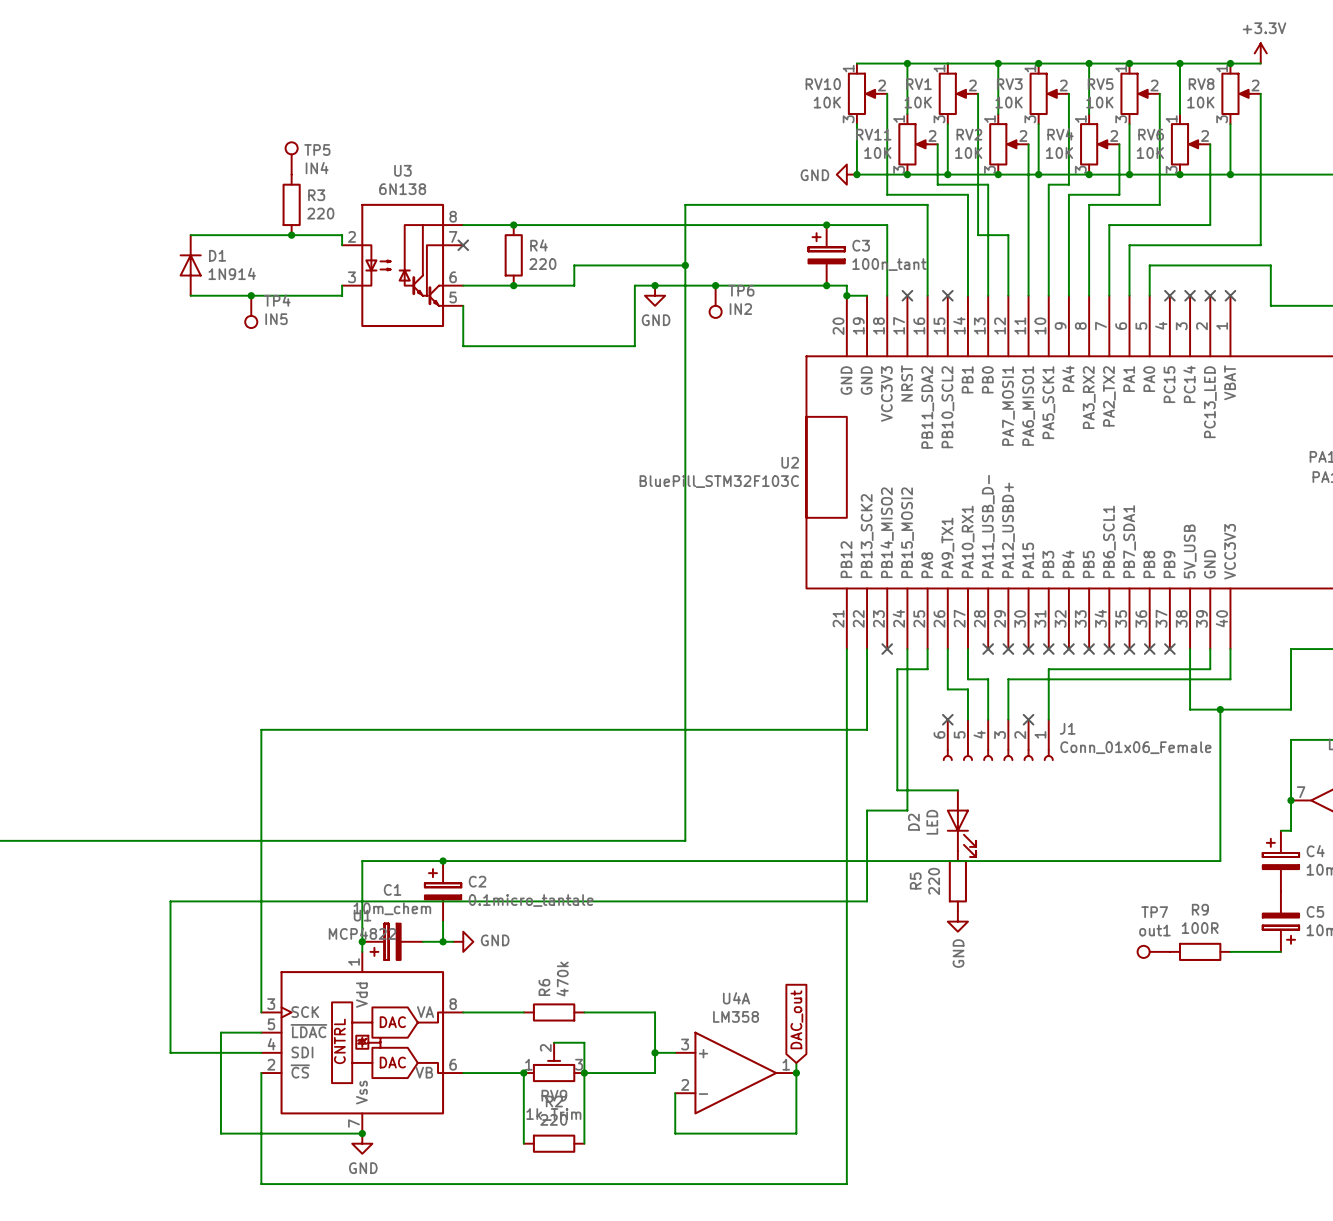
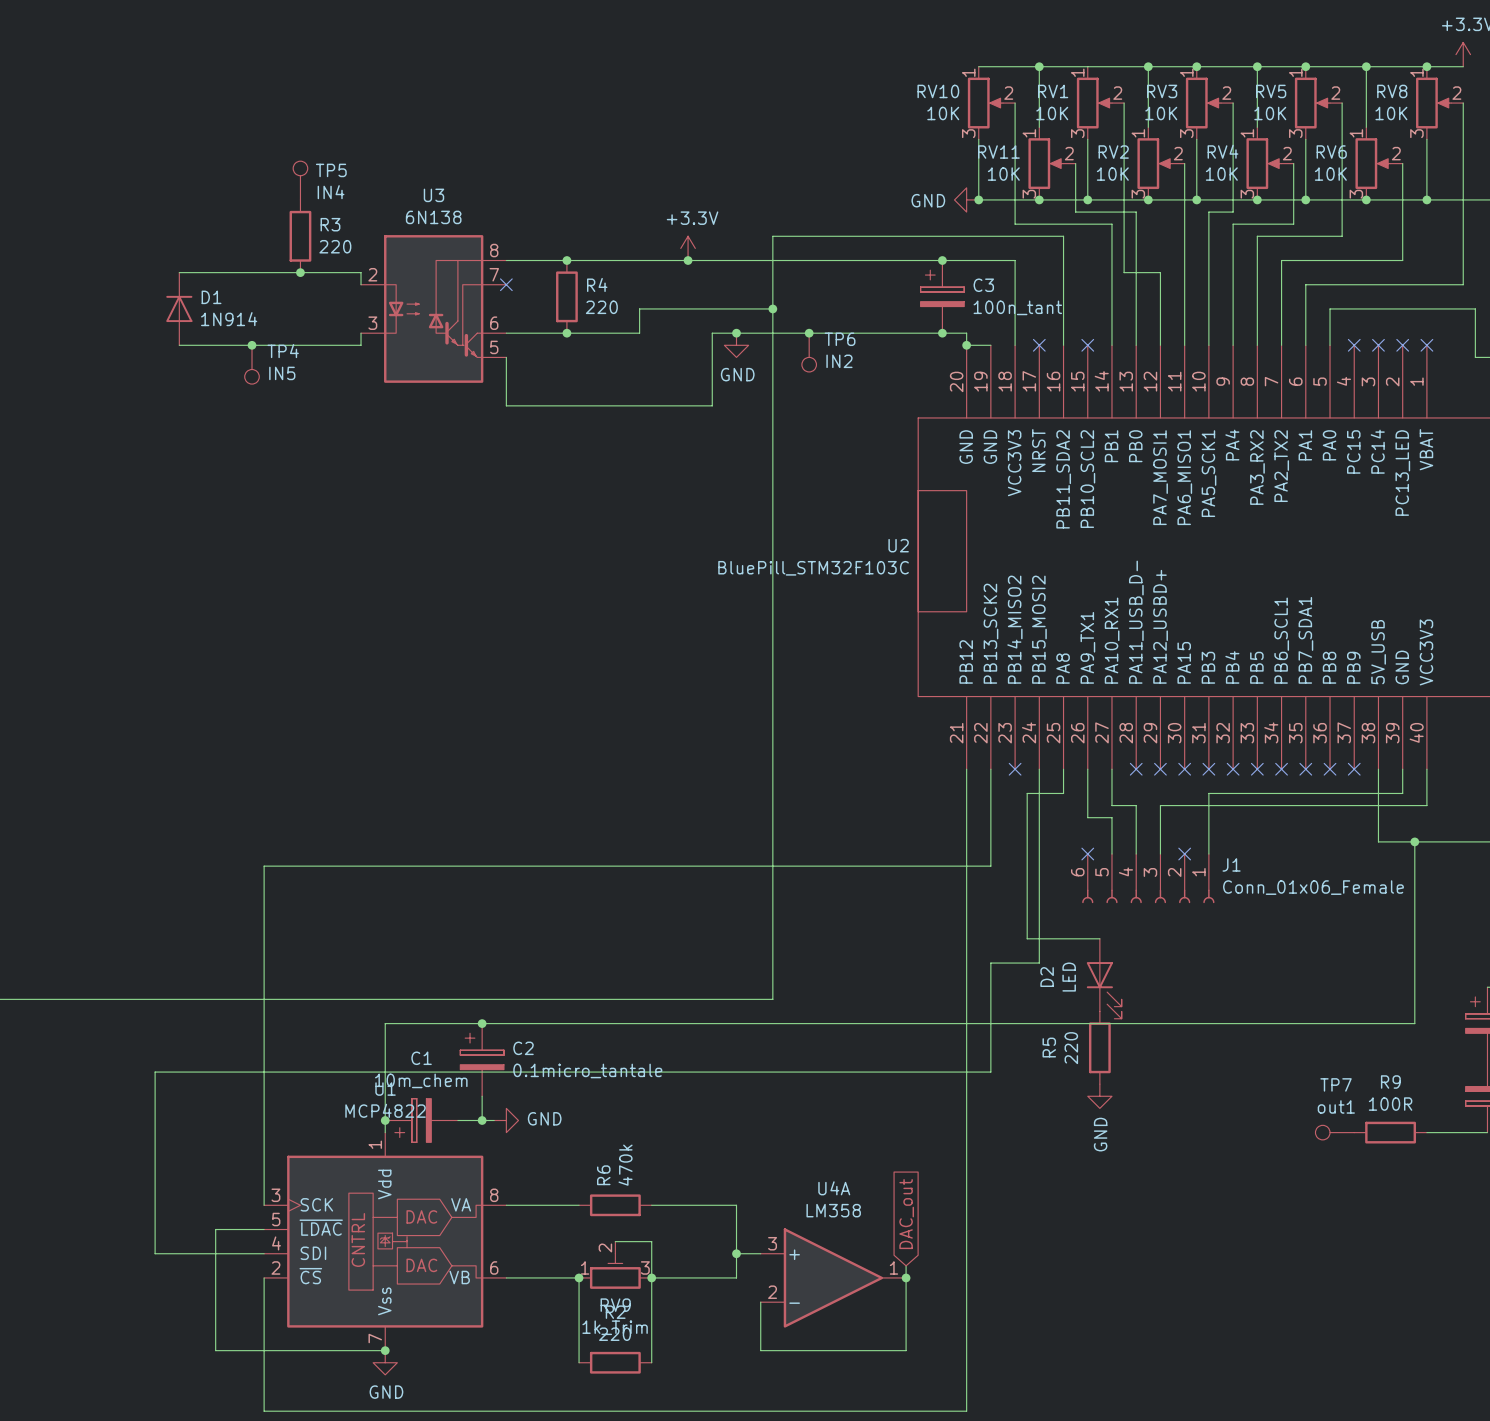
power symbol: none -> +3.3V (688, 248)
junction: none -> (688, 260)

